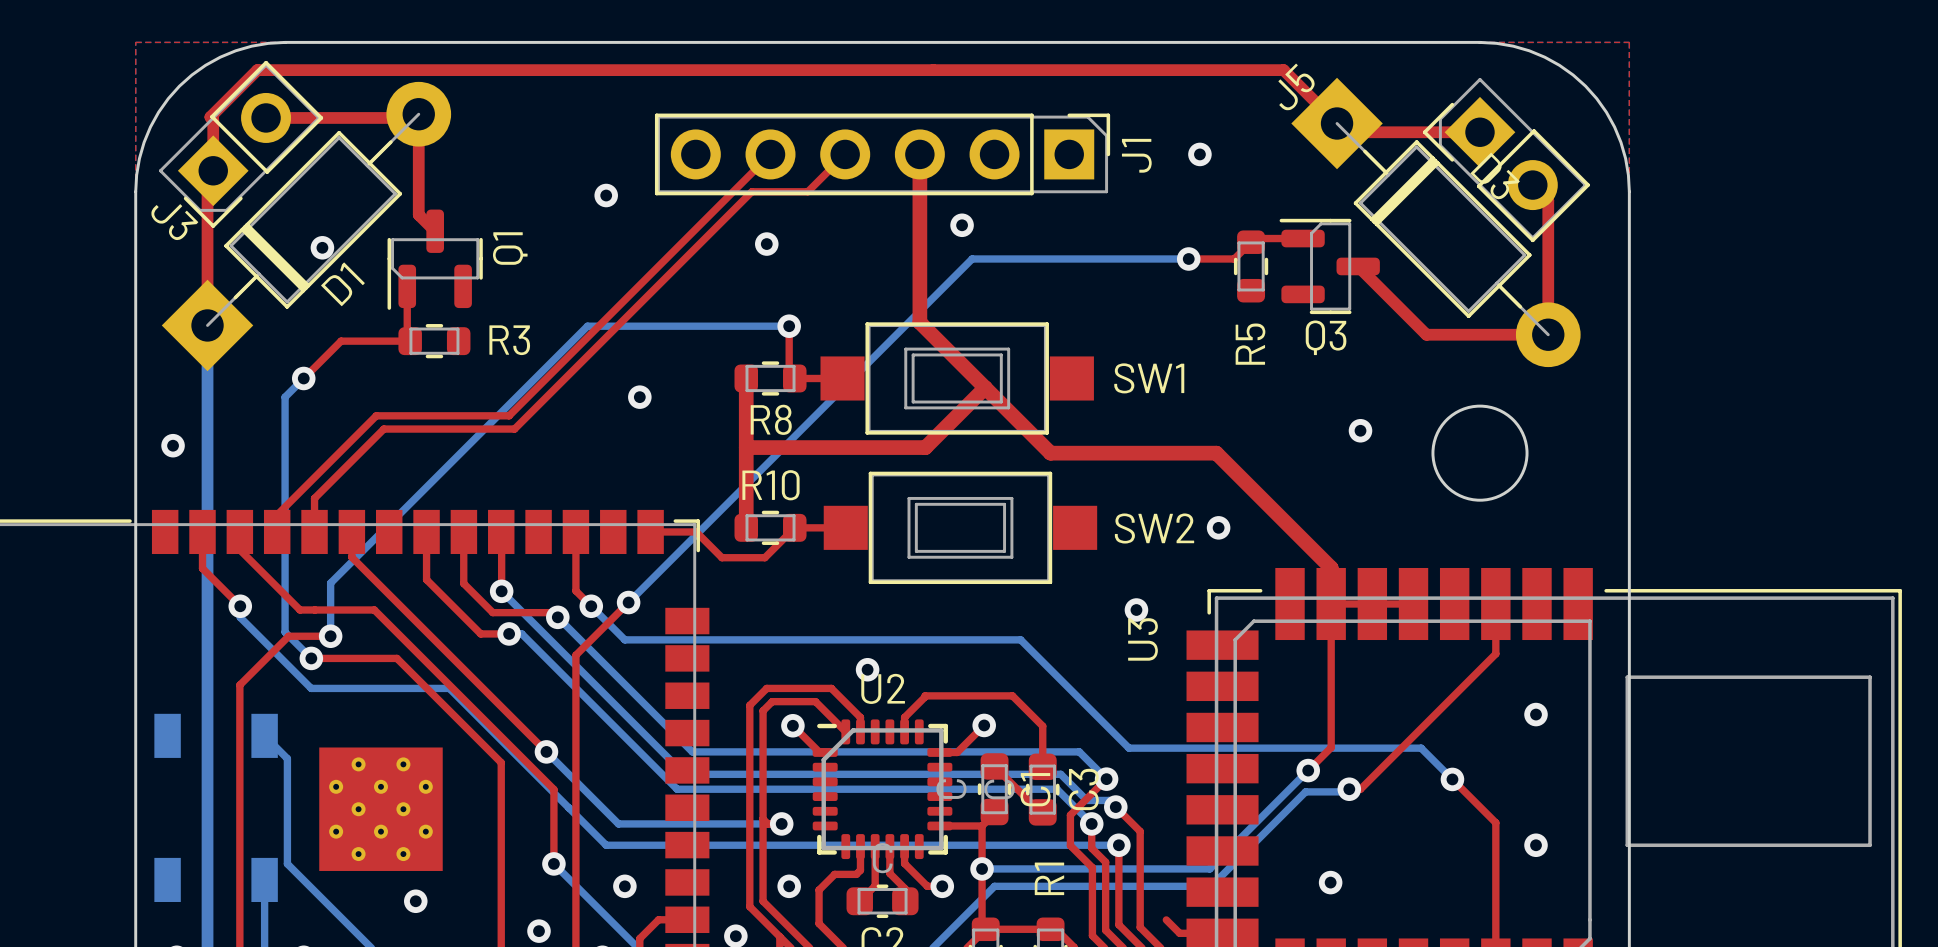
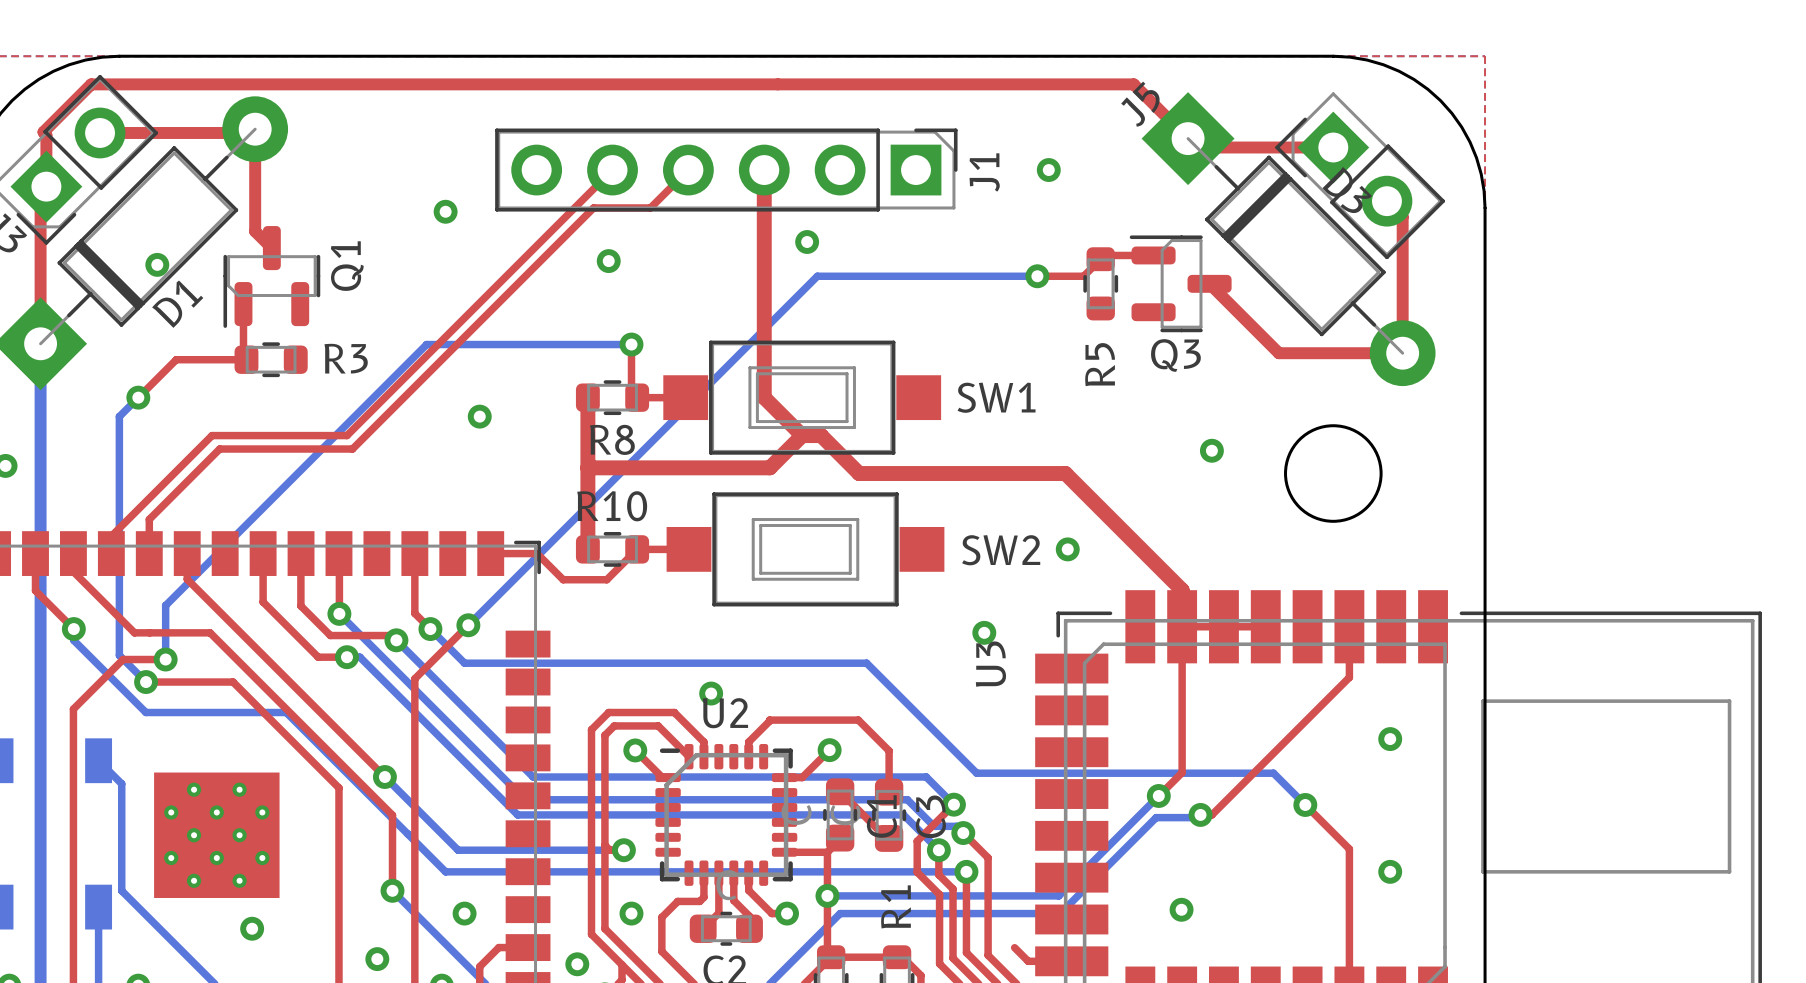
top track: (919, 322) (1050, 453) -> (764, 340) (764, 397) (802, 435) (821, 435) (859, 473) (897, 473)
top track: (985, 387) (957, 415) -> none

